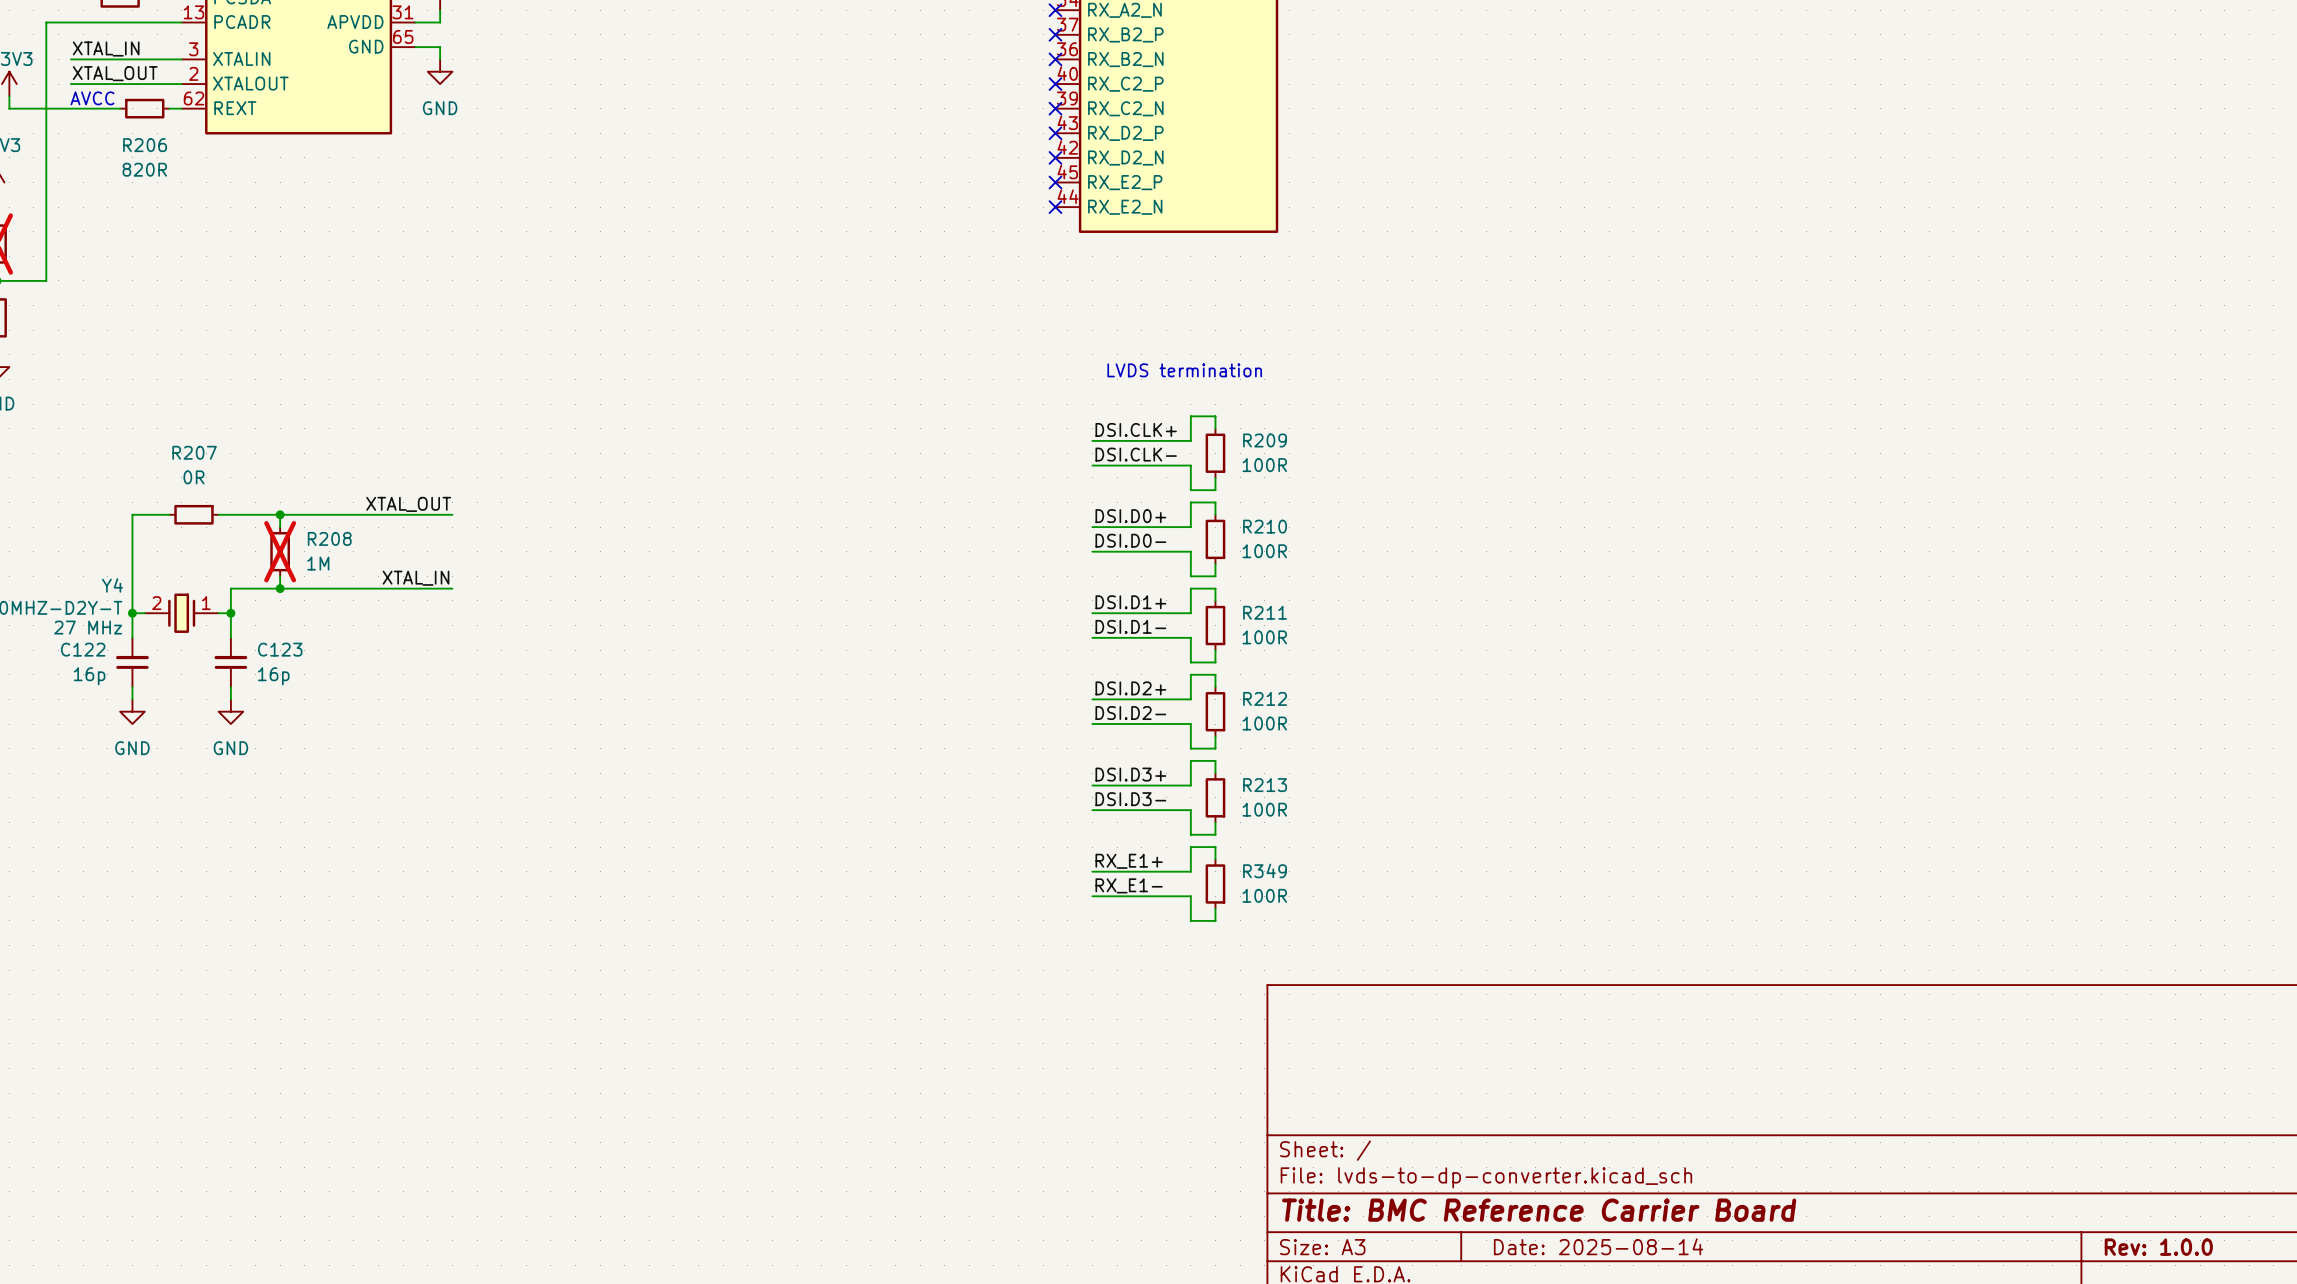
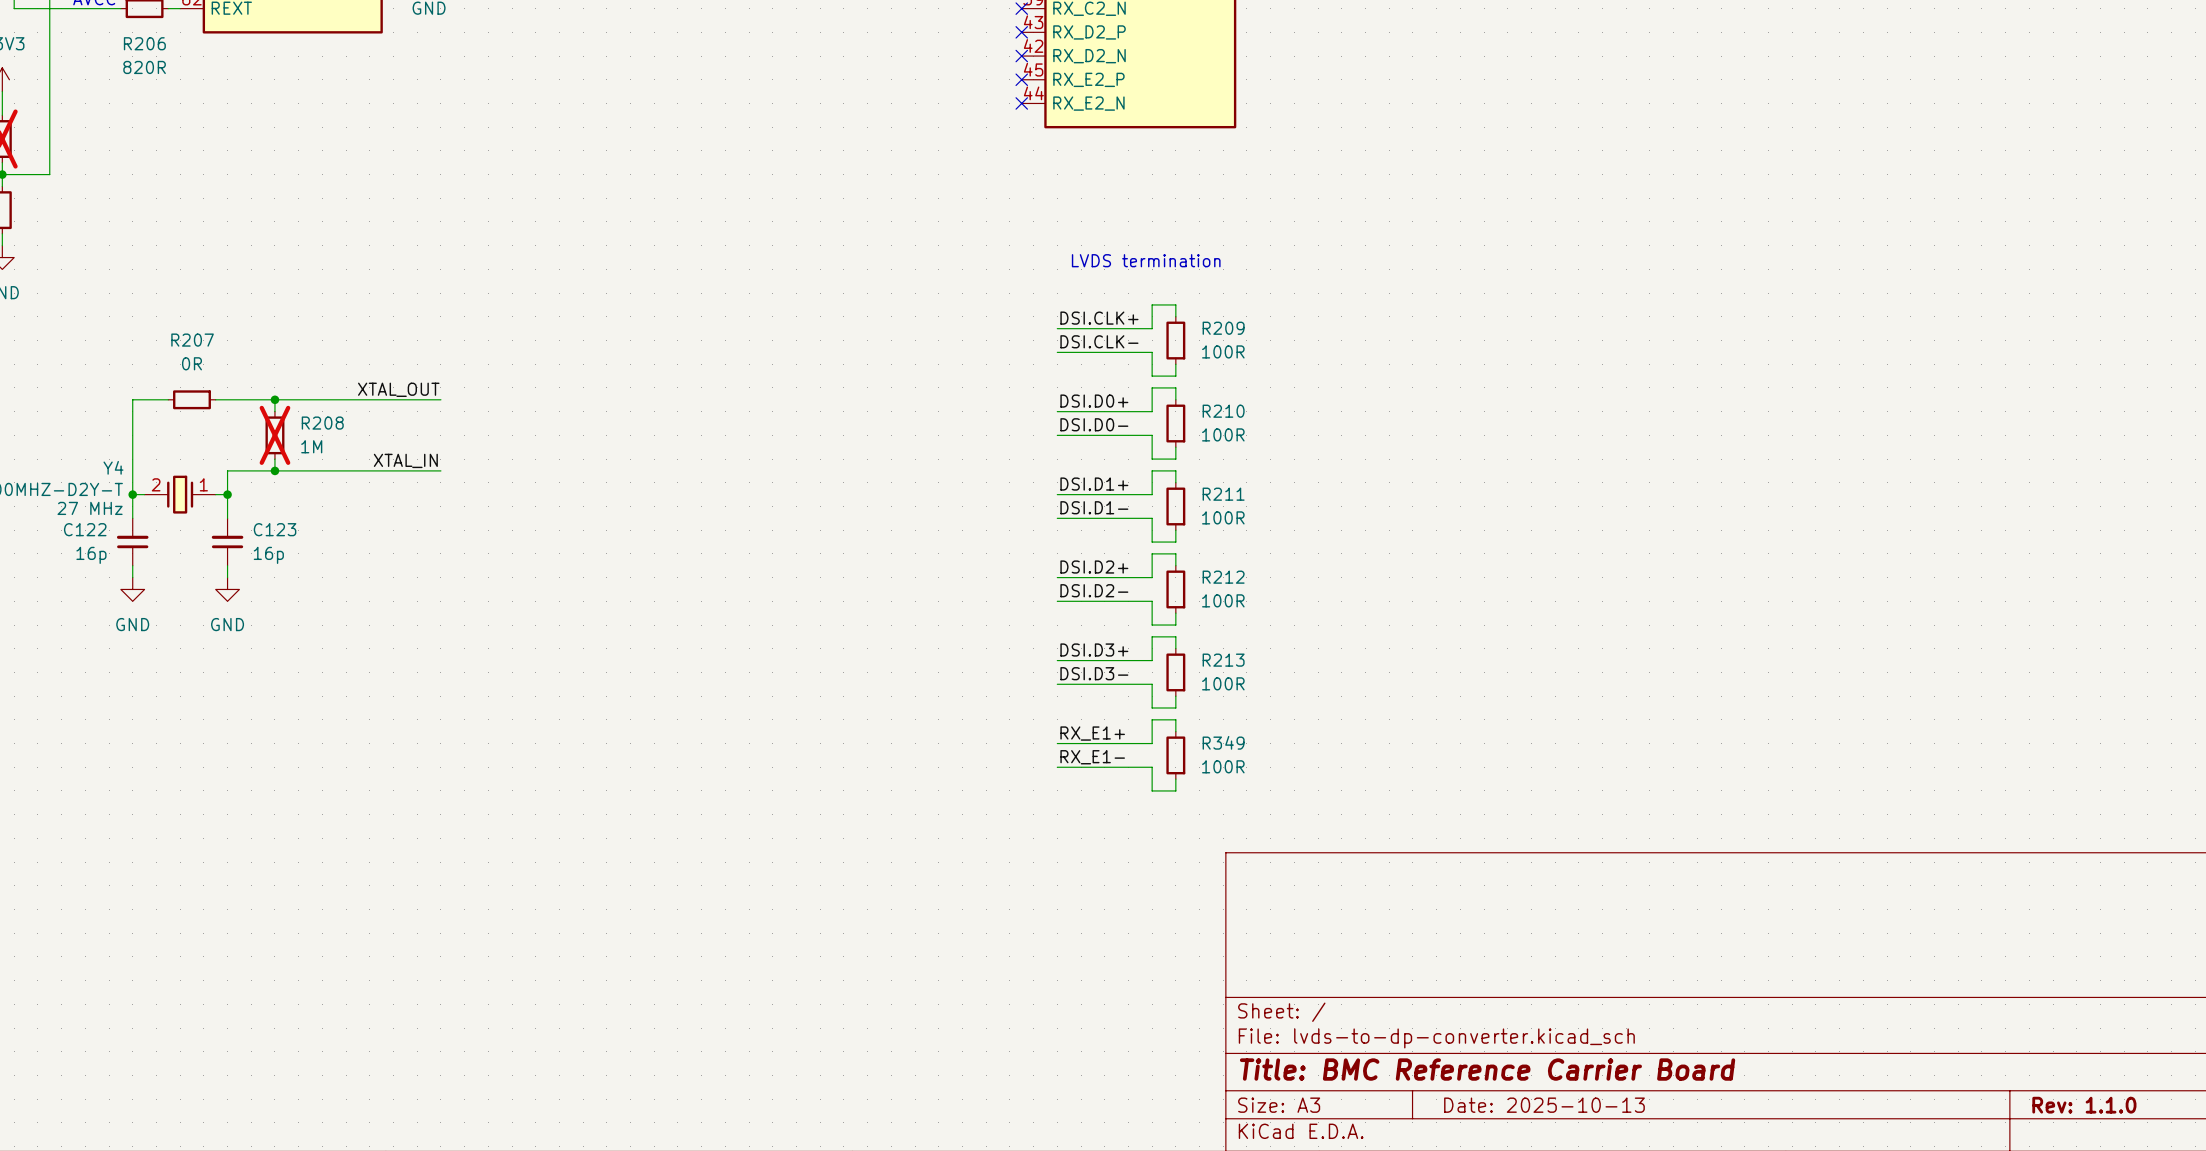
title block: Date: 2025-08-14 (1598, 1246) -> Date: 2025-10-13 (1544, 1105)
title block: Rev: 1.0.0 (2158, 1247) -> Rev: 1.1.0 (2084, 1105)

